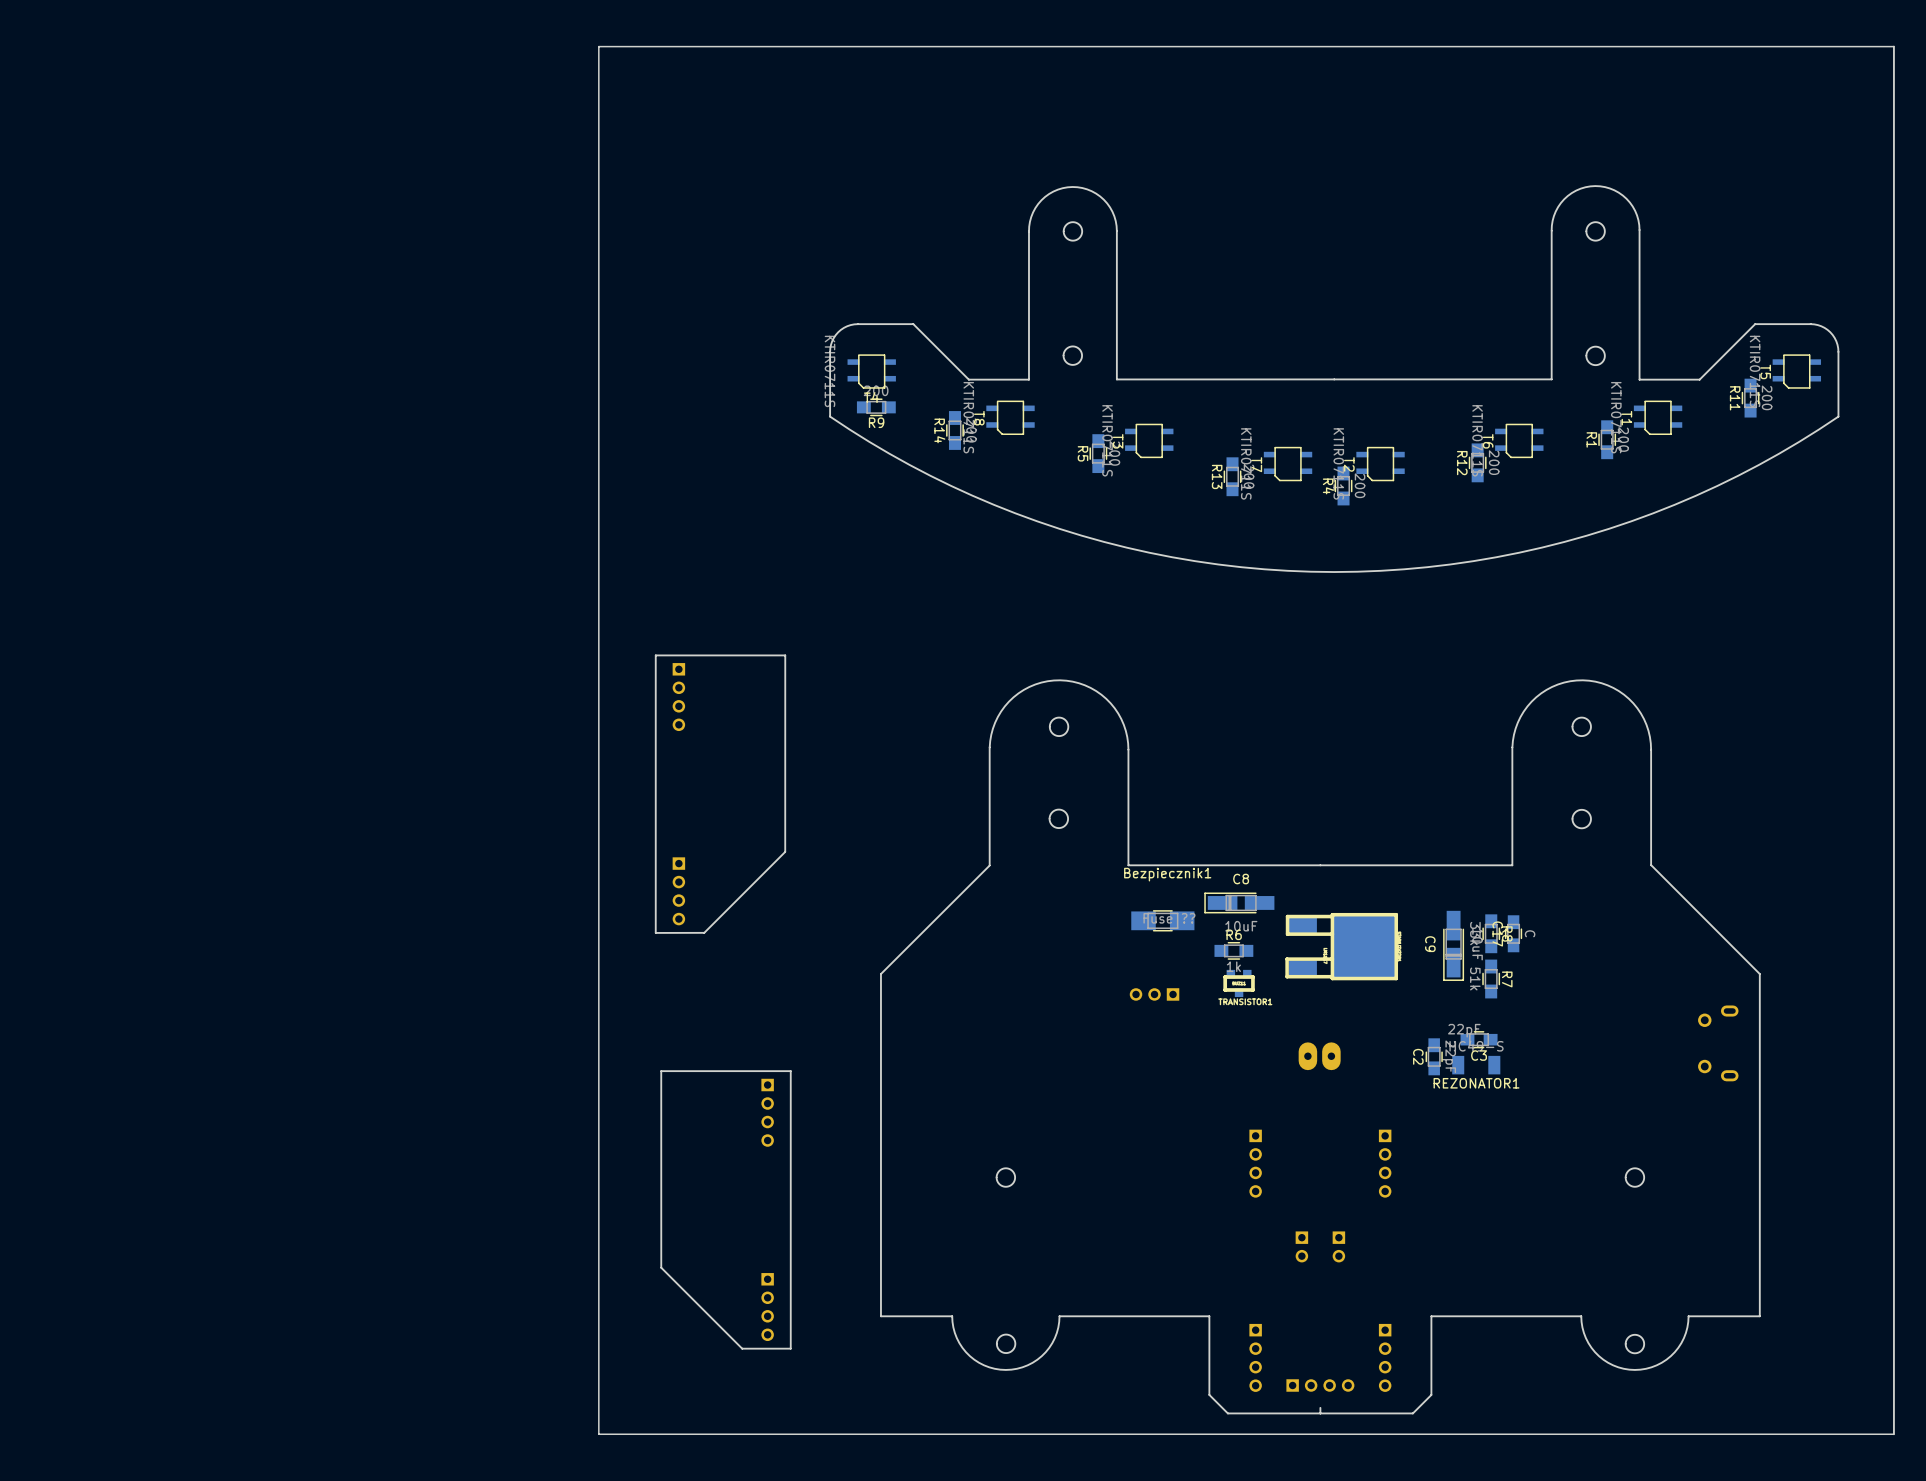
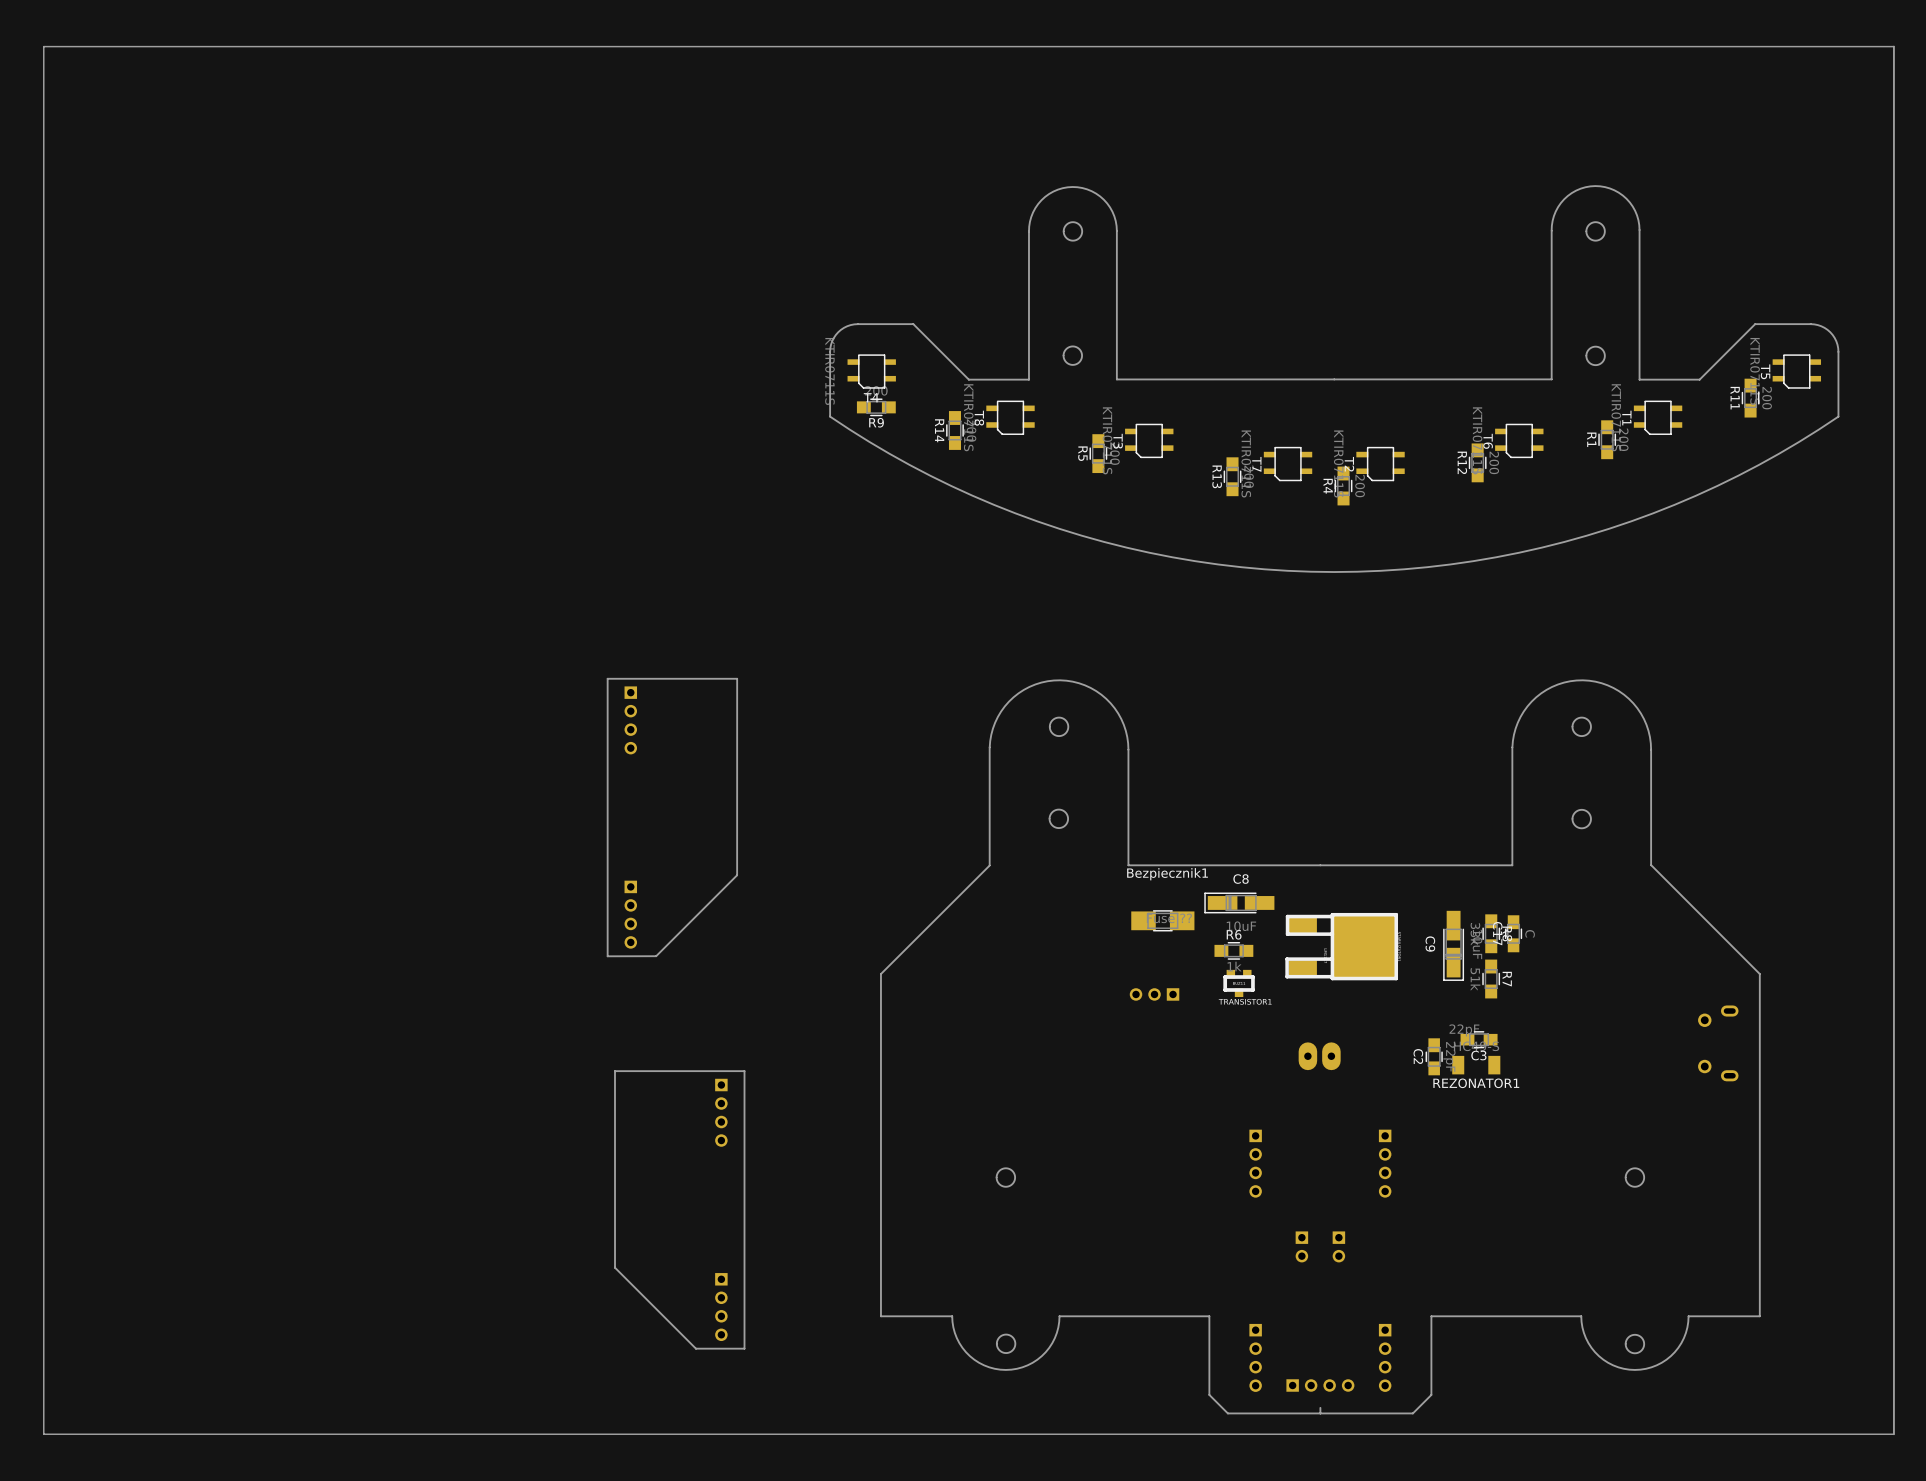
board edge: (598, 46) (598, 1434) -> (598, 46) (43, 46) (43, 1434) (598, 1434)
board edge: (785, 655) (655, 655) (655, 932) (704, 932) (785, 851) (785, 655) -> (737, 678) (607, 678) (607, 956) (656, 956) (737, 875) (737, 678)
part position: (678, 697) -> (630, 720)
part position: (678, 891) -> (630, 914)
board edge: (661, 1071) (661, 1267) (742, 1348) -> (661, 1071) (614, 1071) (615, 1267) (695, 1348) (742, 1348)
board edge: (744, 1071) (790, 1071) (790, 1348) (744, 1348) -> (744, 1071) (744, 1348)
part position: (767, 1112) -> (721, 1112)
part position: (767, 1307) -> (721, 1307)

